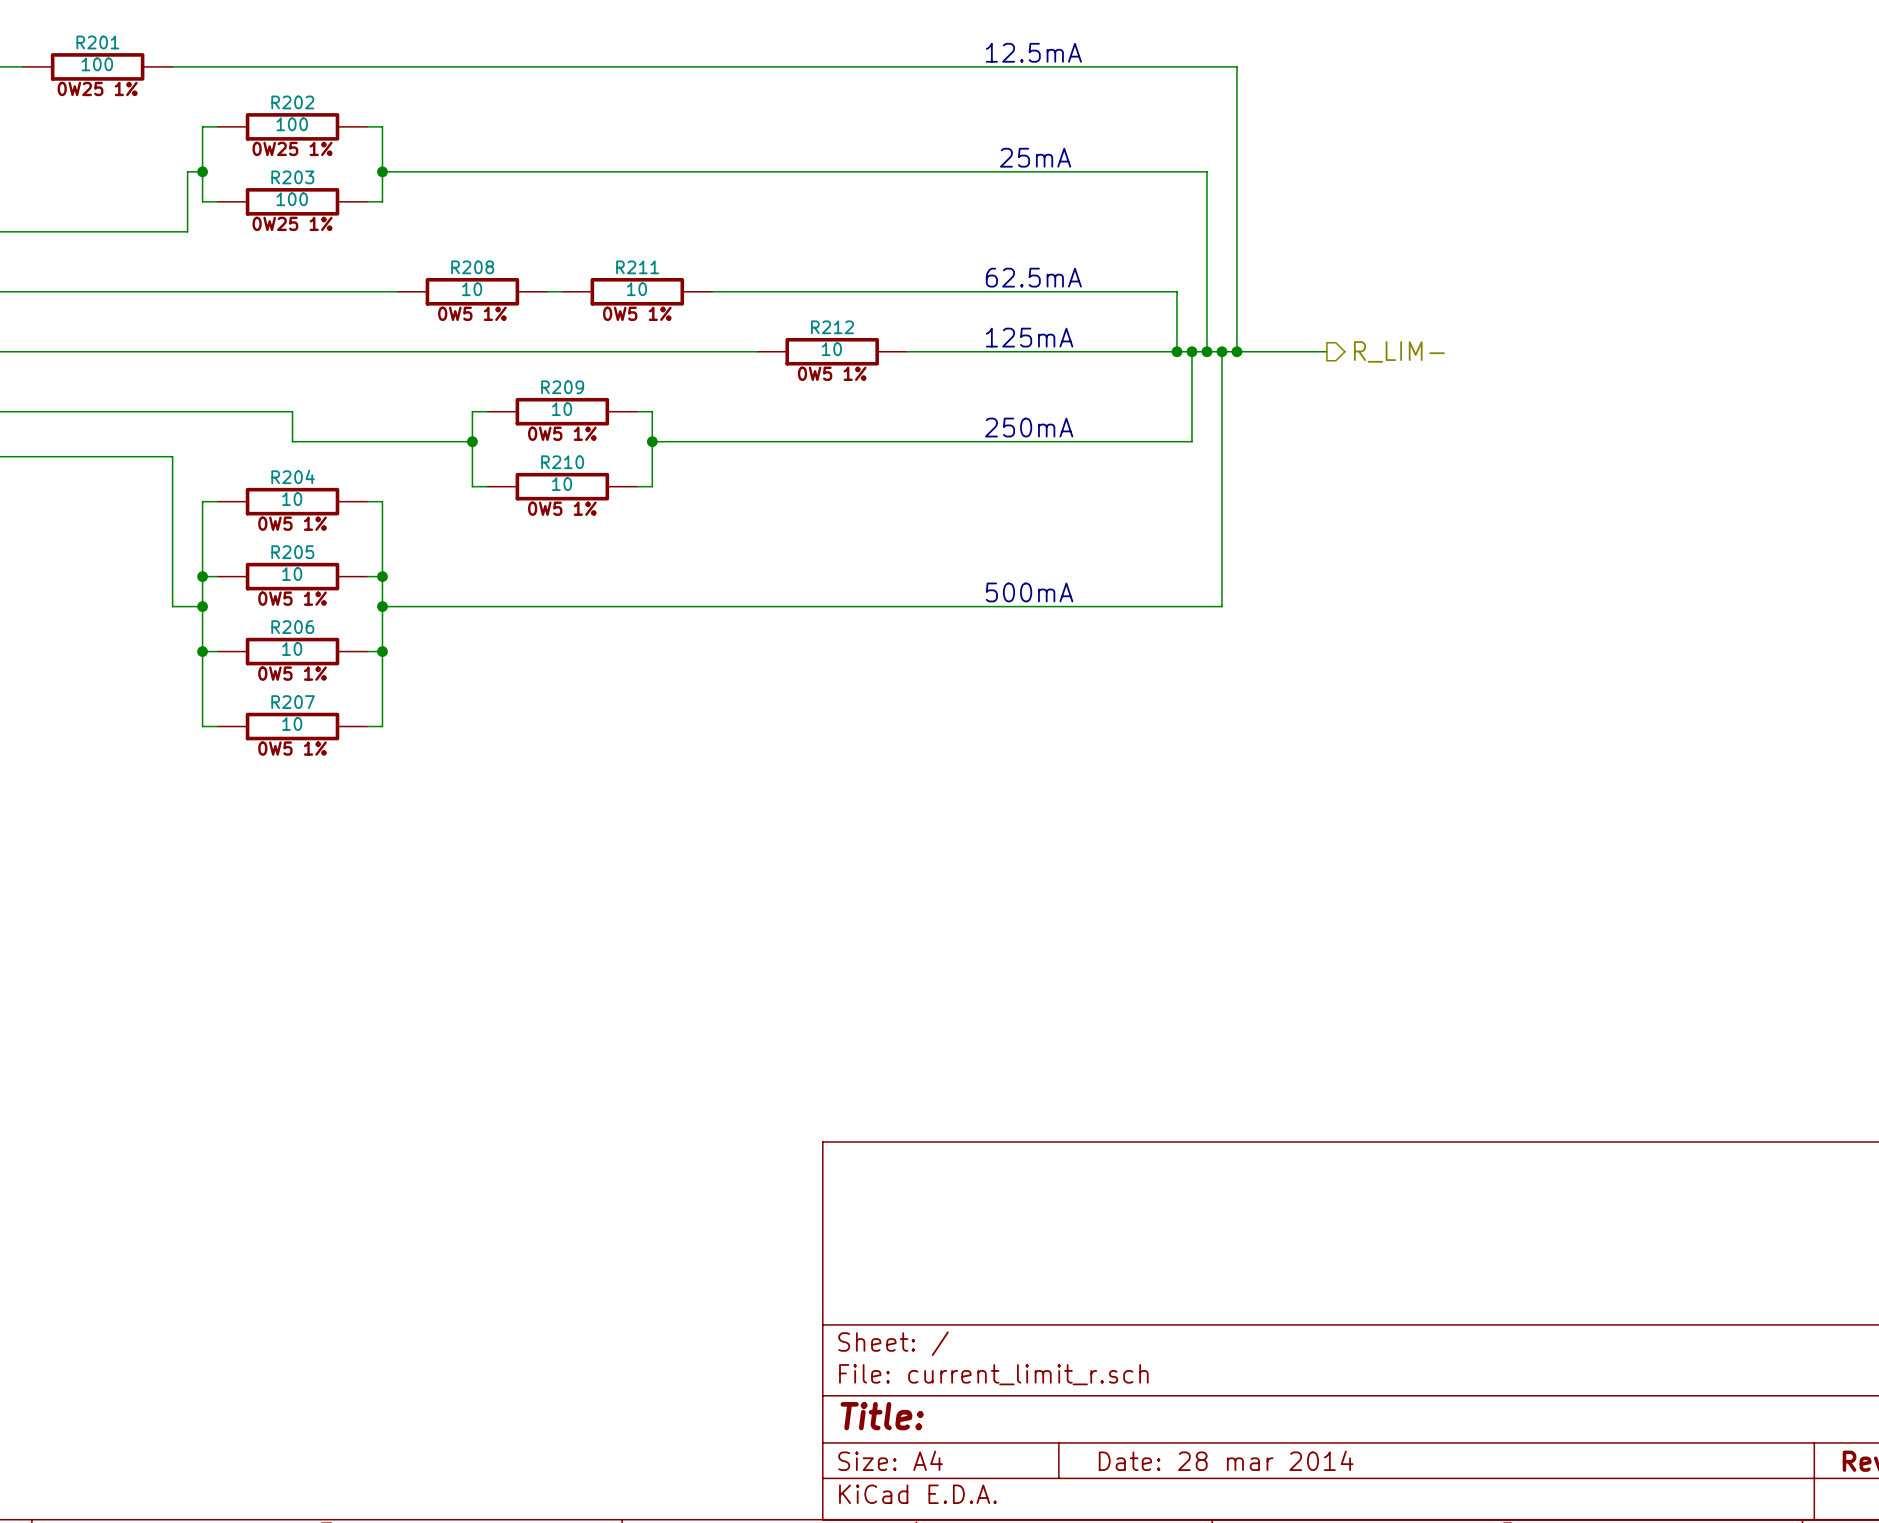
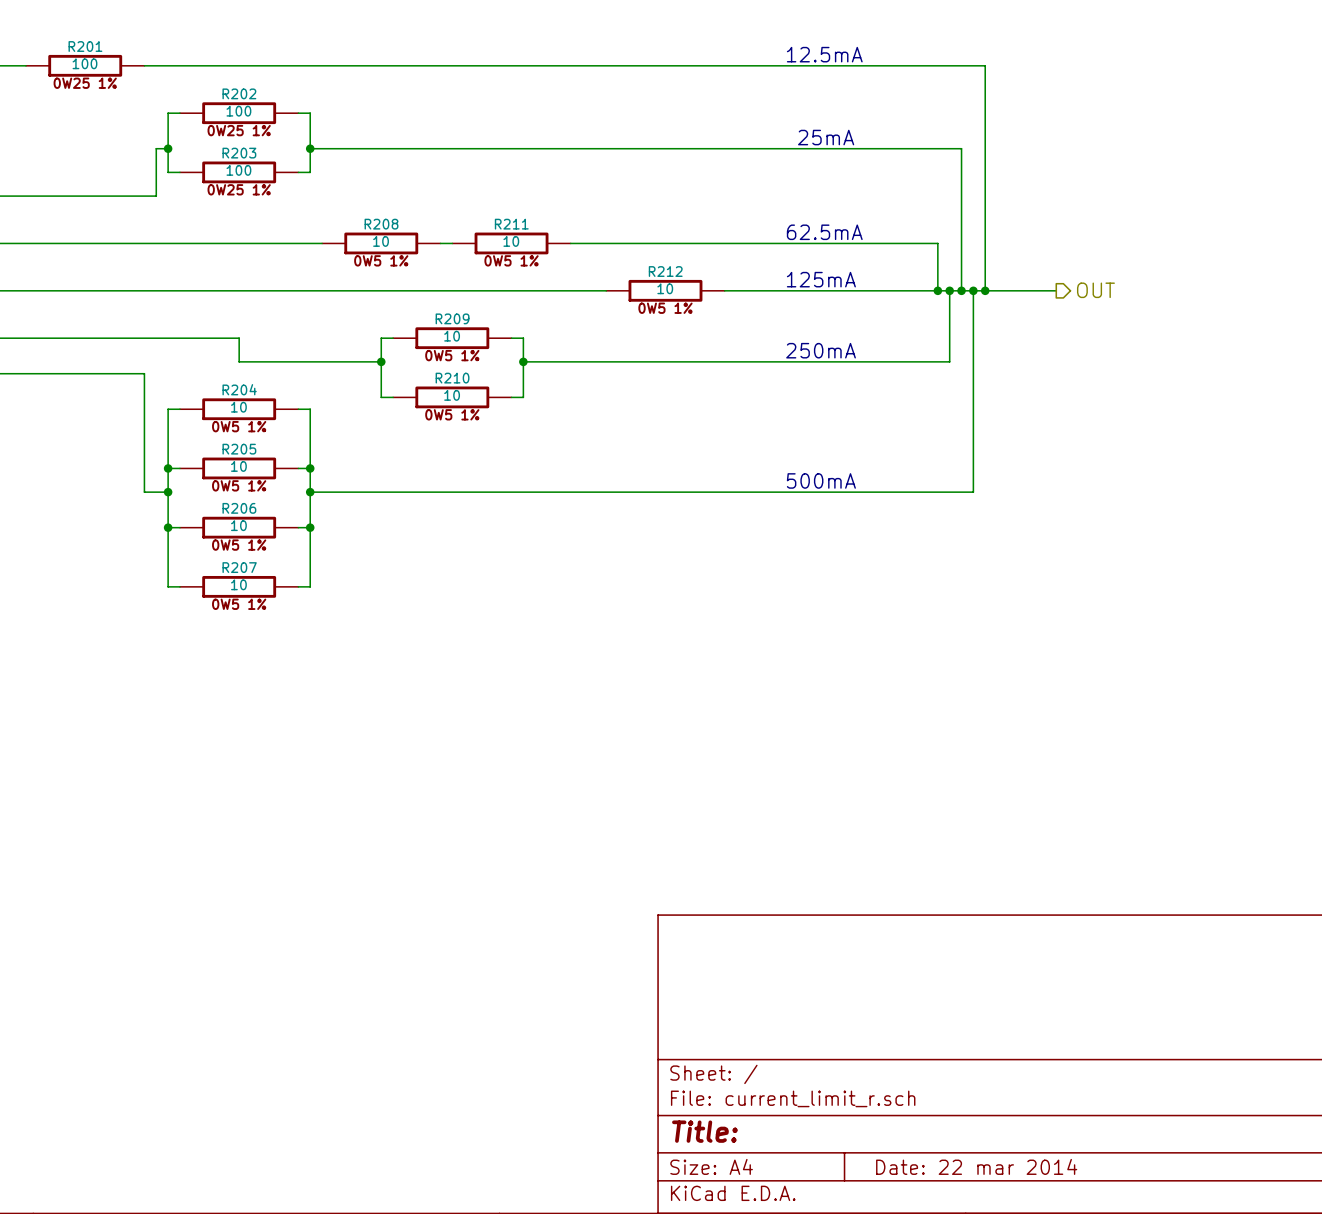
hierarchical label: R_LIM- (1399, 351) -> OUT (1095, 290)
title block: Date: 28 mar 2014 (1226, 1460) -> Date: 22 mar 2014 (976, 1166)

